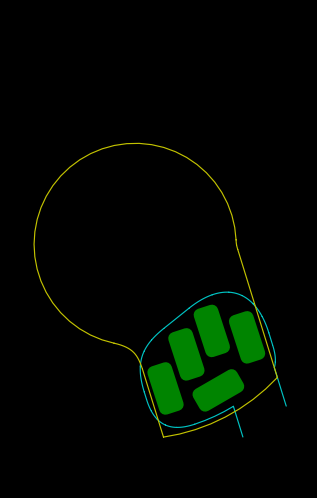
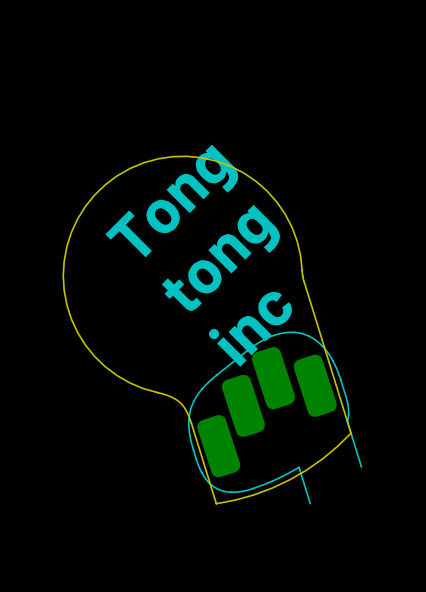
text: none -> Tong (172, 200)
text: none -> tong (221, 258)
text: none -> inc (250, 328)
part: (218, 390) -> none

